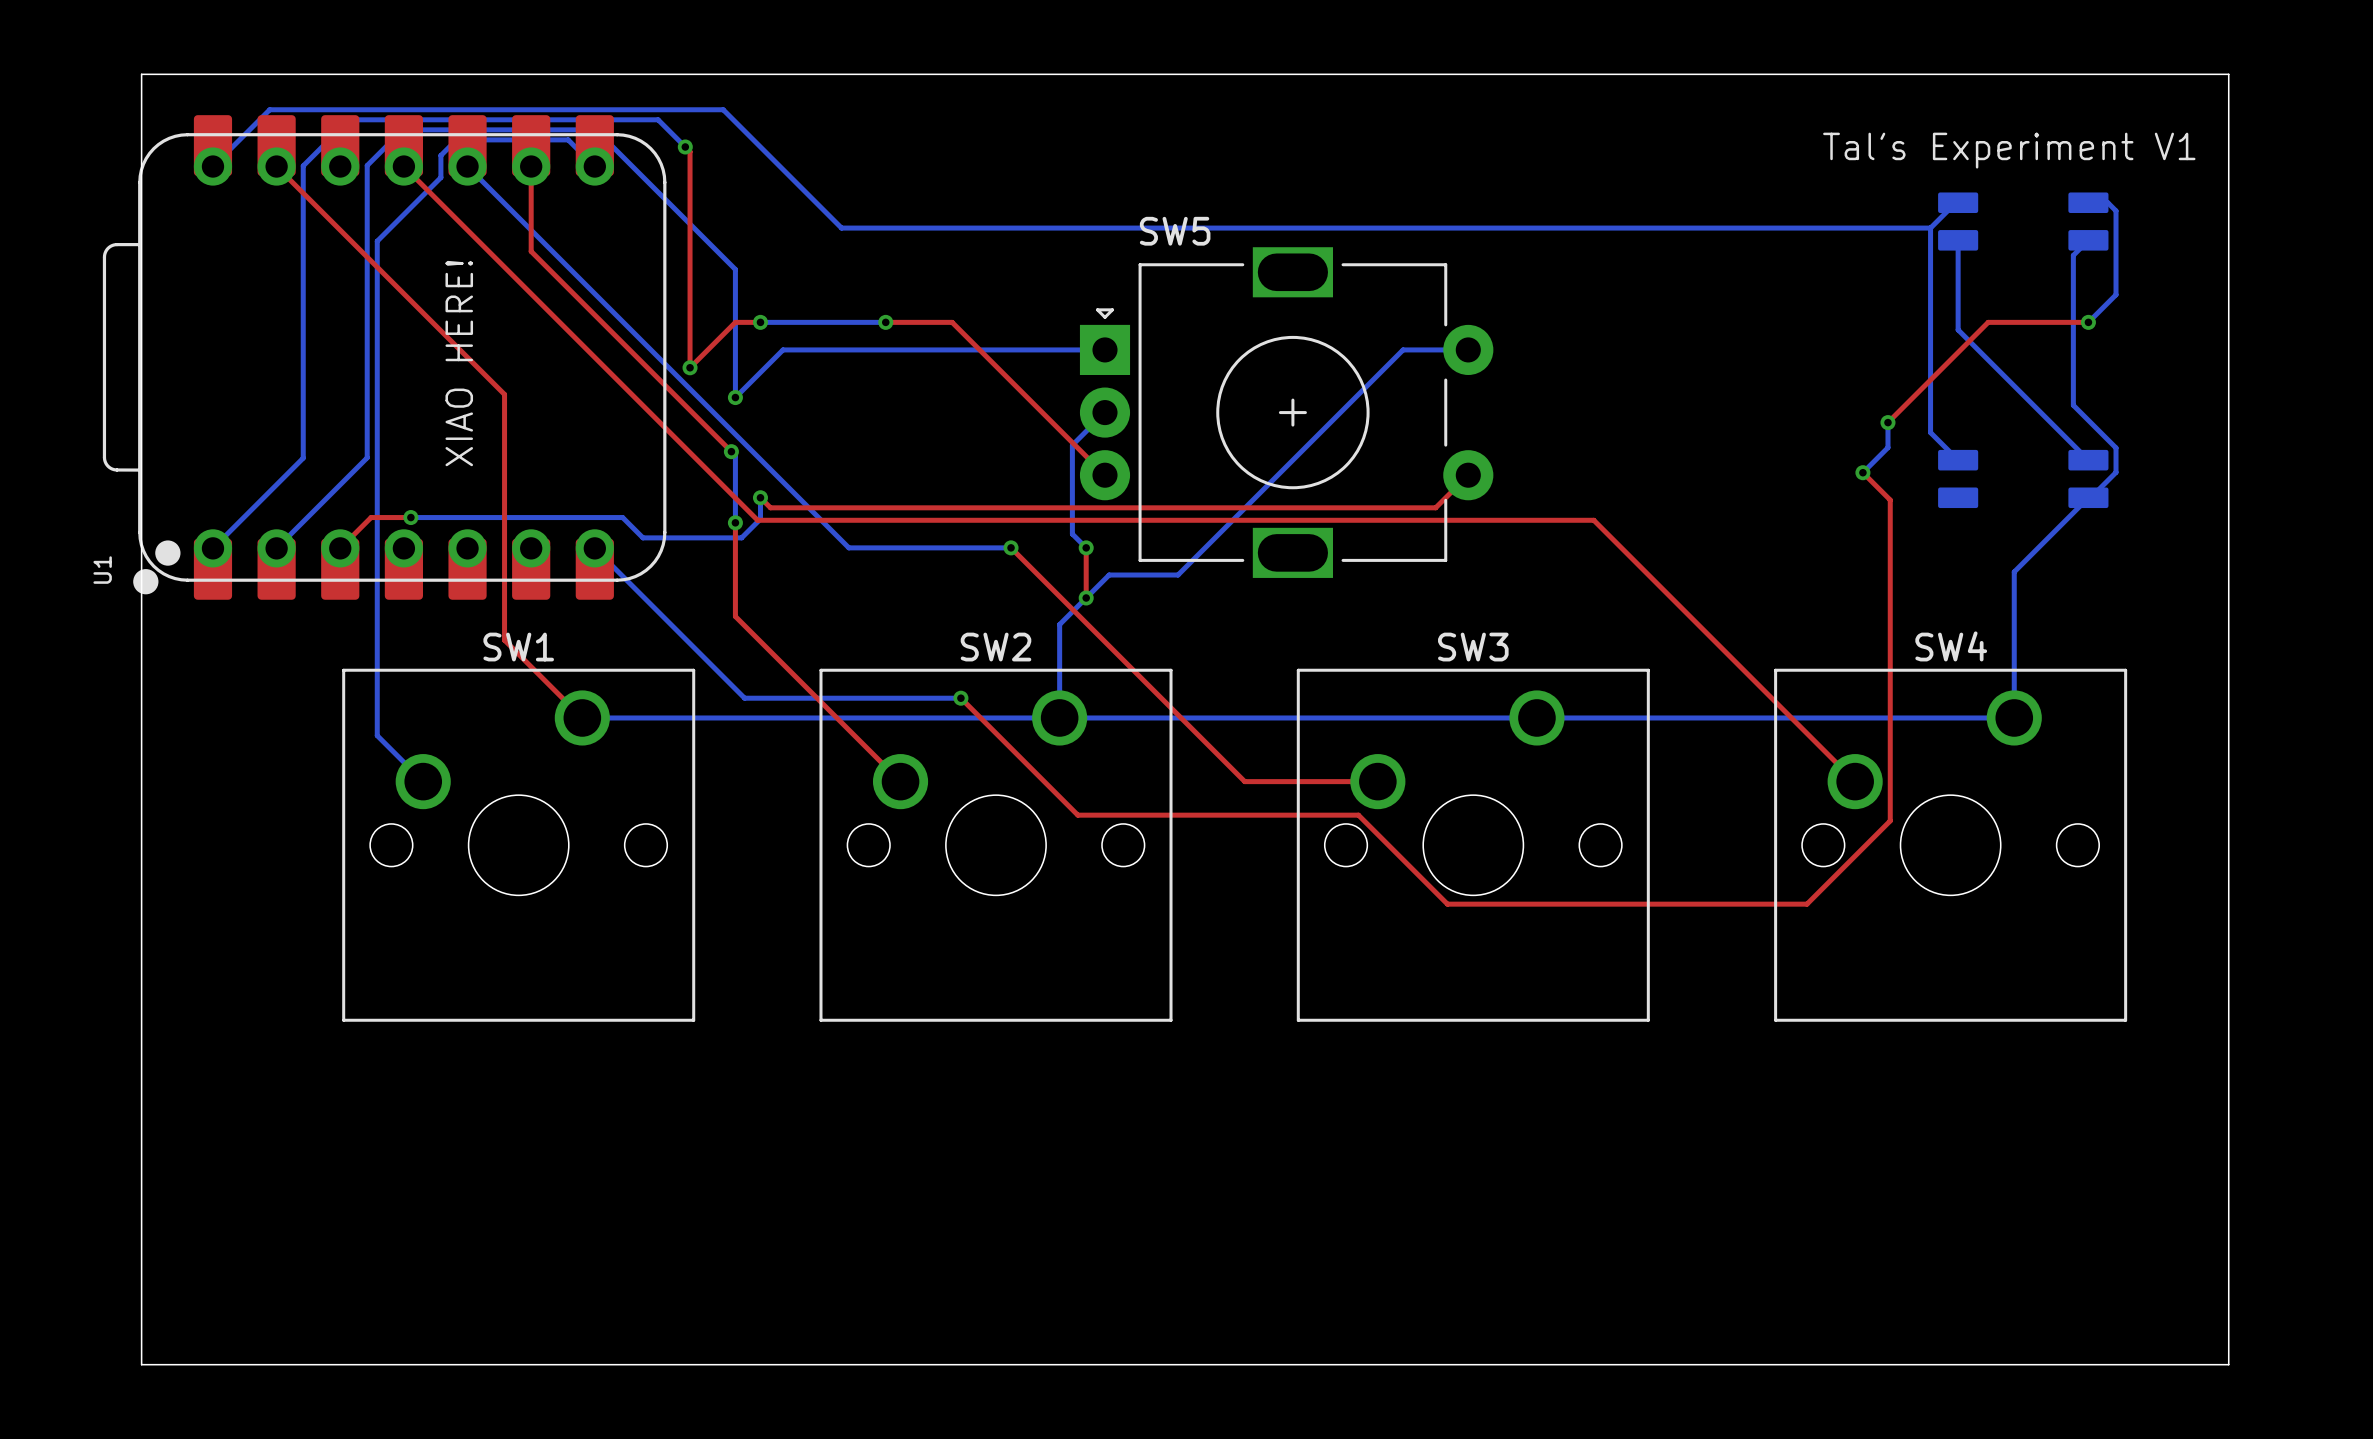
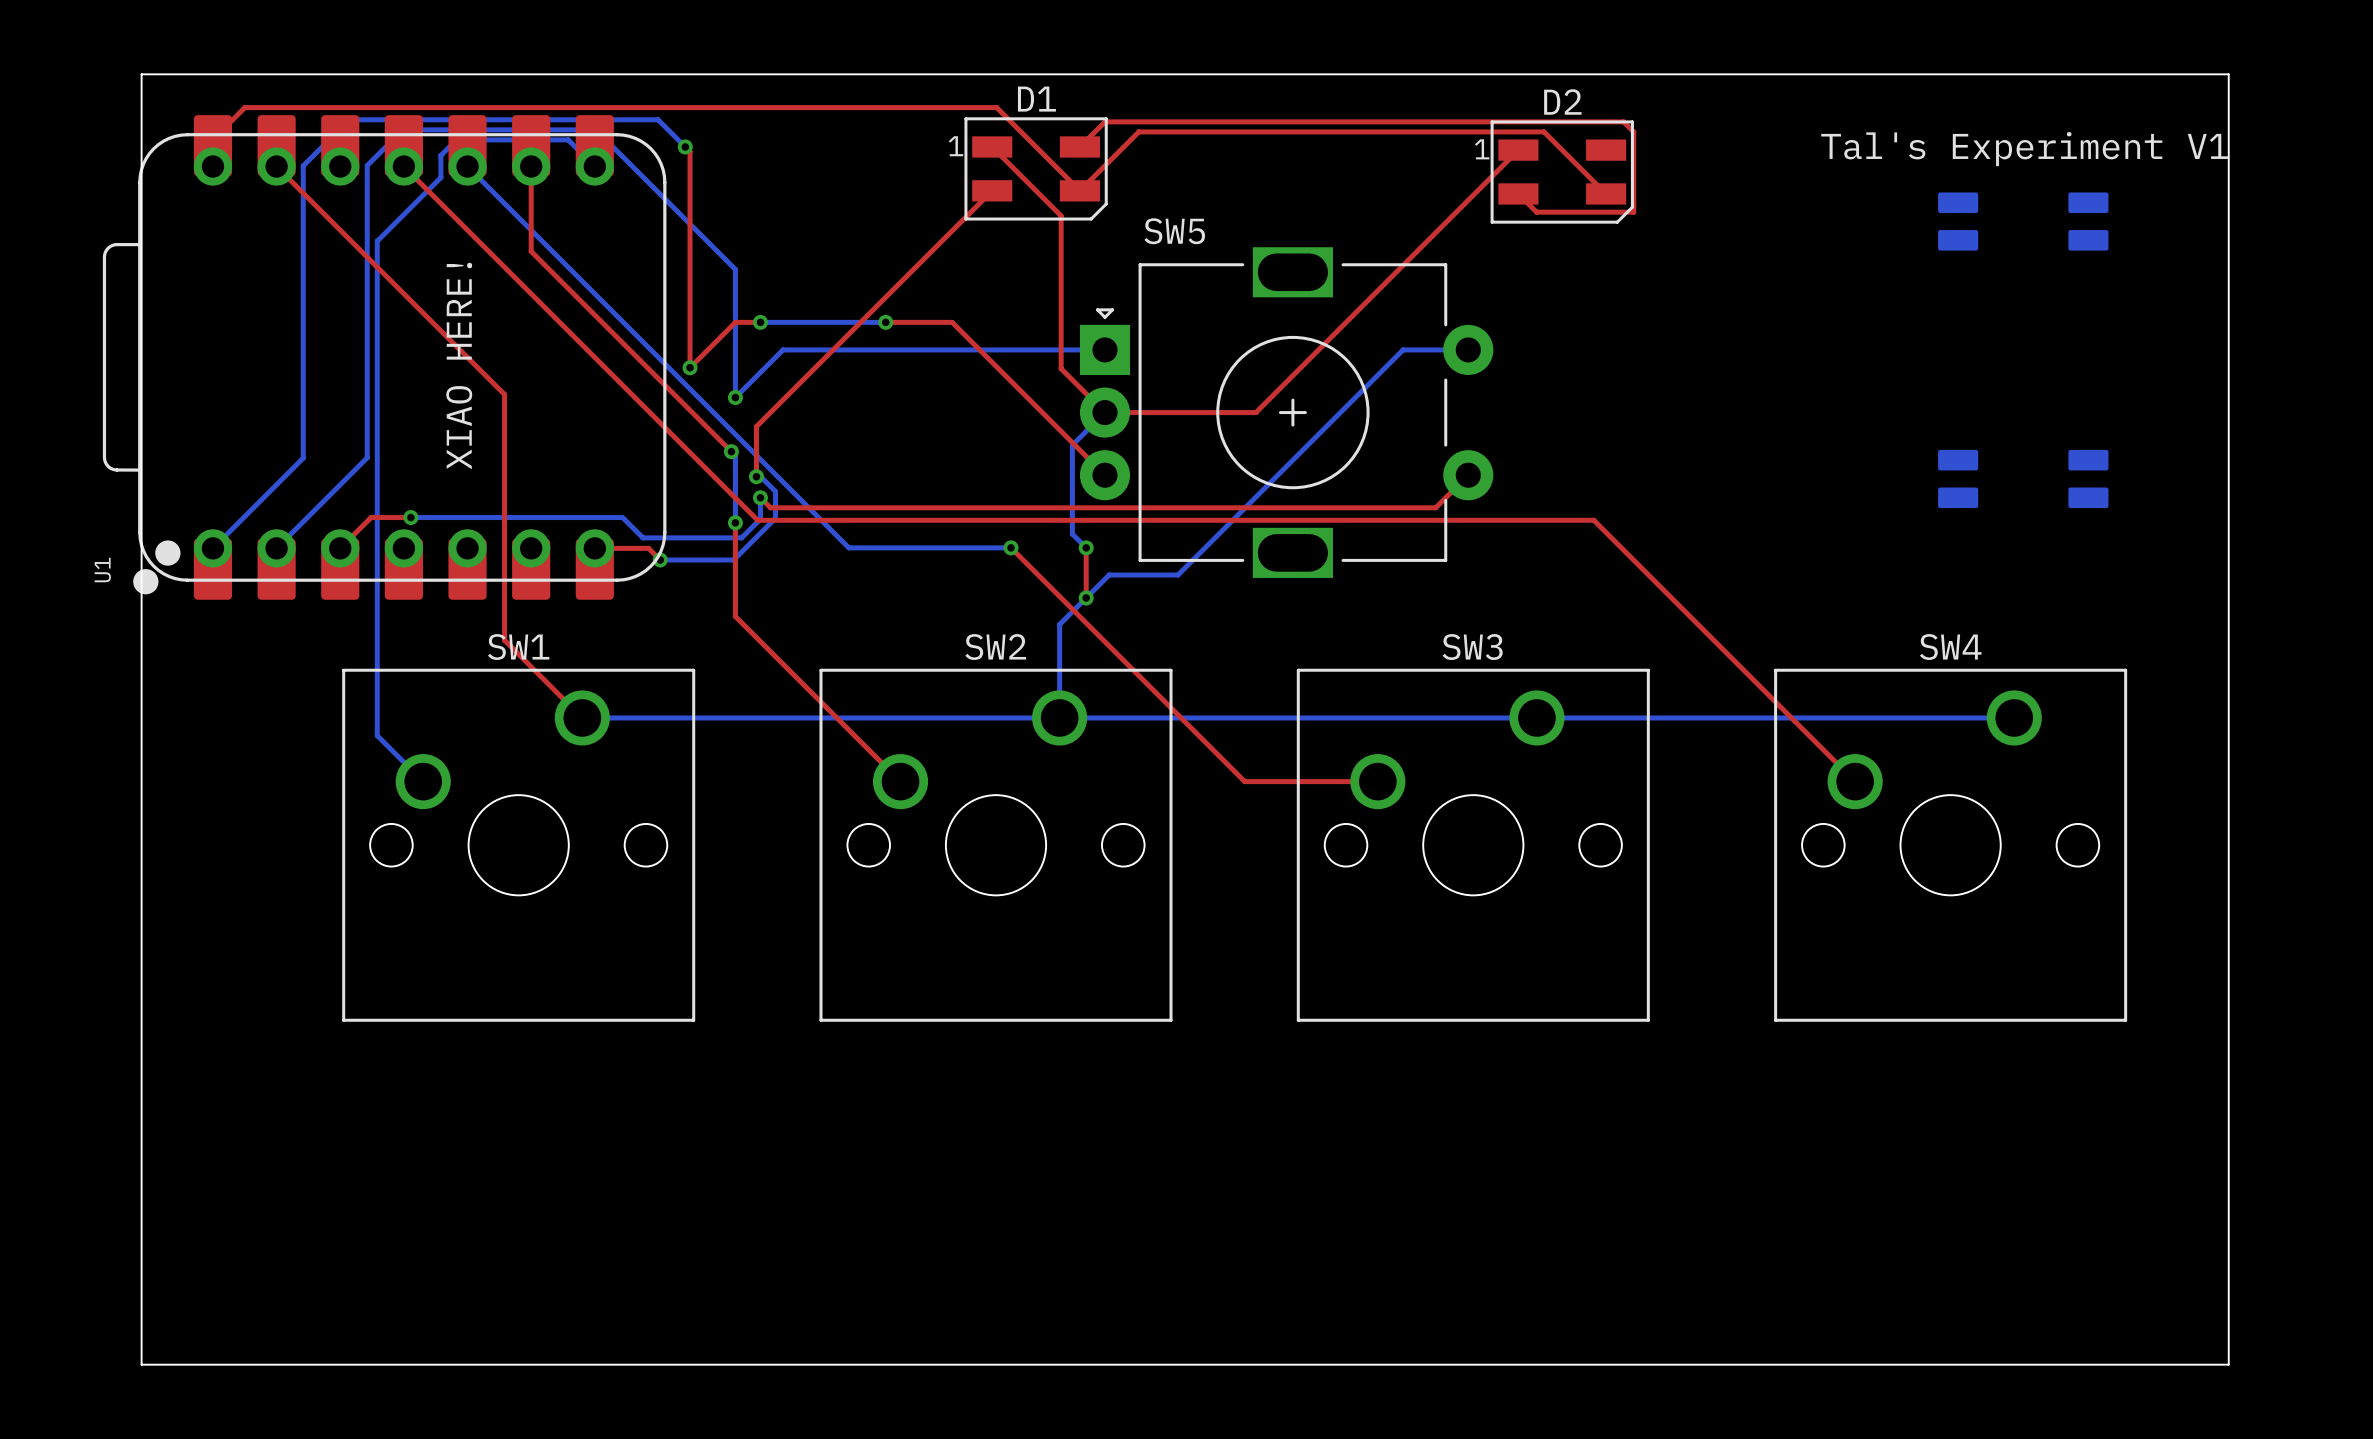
top track: none -> (212, 139) (244, 107) (996, 107) (1079, 190) (1138, 131) (1544, 131) (1606, 193)
top track: none -> (992, 146) (1061, 215) (1061, 368) (1104, 412) (1255, 412) (1518, 150)
top track: none -> (1079, 146) (1105, 121) (1623, 121) (1633, 131) (1633, 212) (1536, 212) (1518, 193)
bottom track: (212, 166) (269, 109) (723, 109) (841, 228) (1930, 228) -> none
D1: none -> (1036, 168)
D2: none -> (1562, 172)
top track: none -> (992, 190) (756, 426) (756, 476)
bottom track: (1958, 202) (1955, 202) (1930, 228) -> none
bottom track: (2088, 202) (2107, 202) (2116, 210) (2116, 294) (2088, 322) -> none
bottom track: (1930, 228) (1930, 432) (1958, 460) -> none
bottom track: (1958, 240) (1958, 329) (2088, 460) -> none
bottom track: (2088, 240) (2073, 255) (2073, 405) (2116, 447) (2116, 472) (2014, 571) (2014, 717) -> none
top track: (2088, 322) (1988, 322) (1887, 422) -> none
via: (2088, 322) -> none
bottom track: (1887, 422) (1887, 447) (1862, 472) -> none
via: (1887, 422) -> none
top track: (1862, 472) (1890, 500) (1890, 820) (1806, 904) (1447, 904) (1358, 815) (1077, 815) (960, 698) -> none
via: (1862, 472) -> none
bottom track: none -> (756, 476) (760, 476) (775, 491) (775, 518) (733, 559) (660, 559)
via: none -> (756, 476)
top track: none -> (594, 548) (648, 548) (660, 559)
bottom track: (594, 548) (744, 698) (960, 698) -> none
via: none -> (660, 559)
via: (960, 698) -> none

